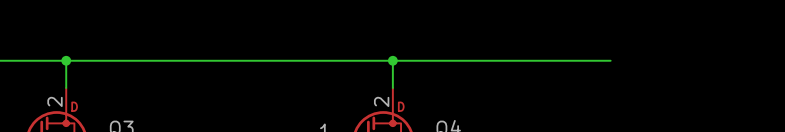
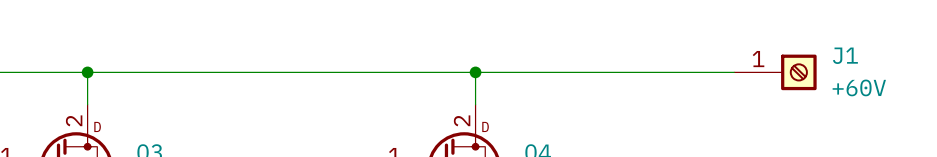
J1: none -> +60V (775, 72)

